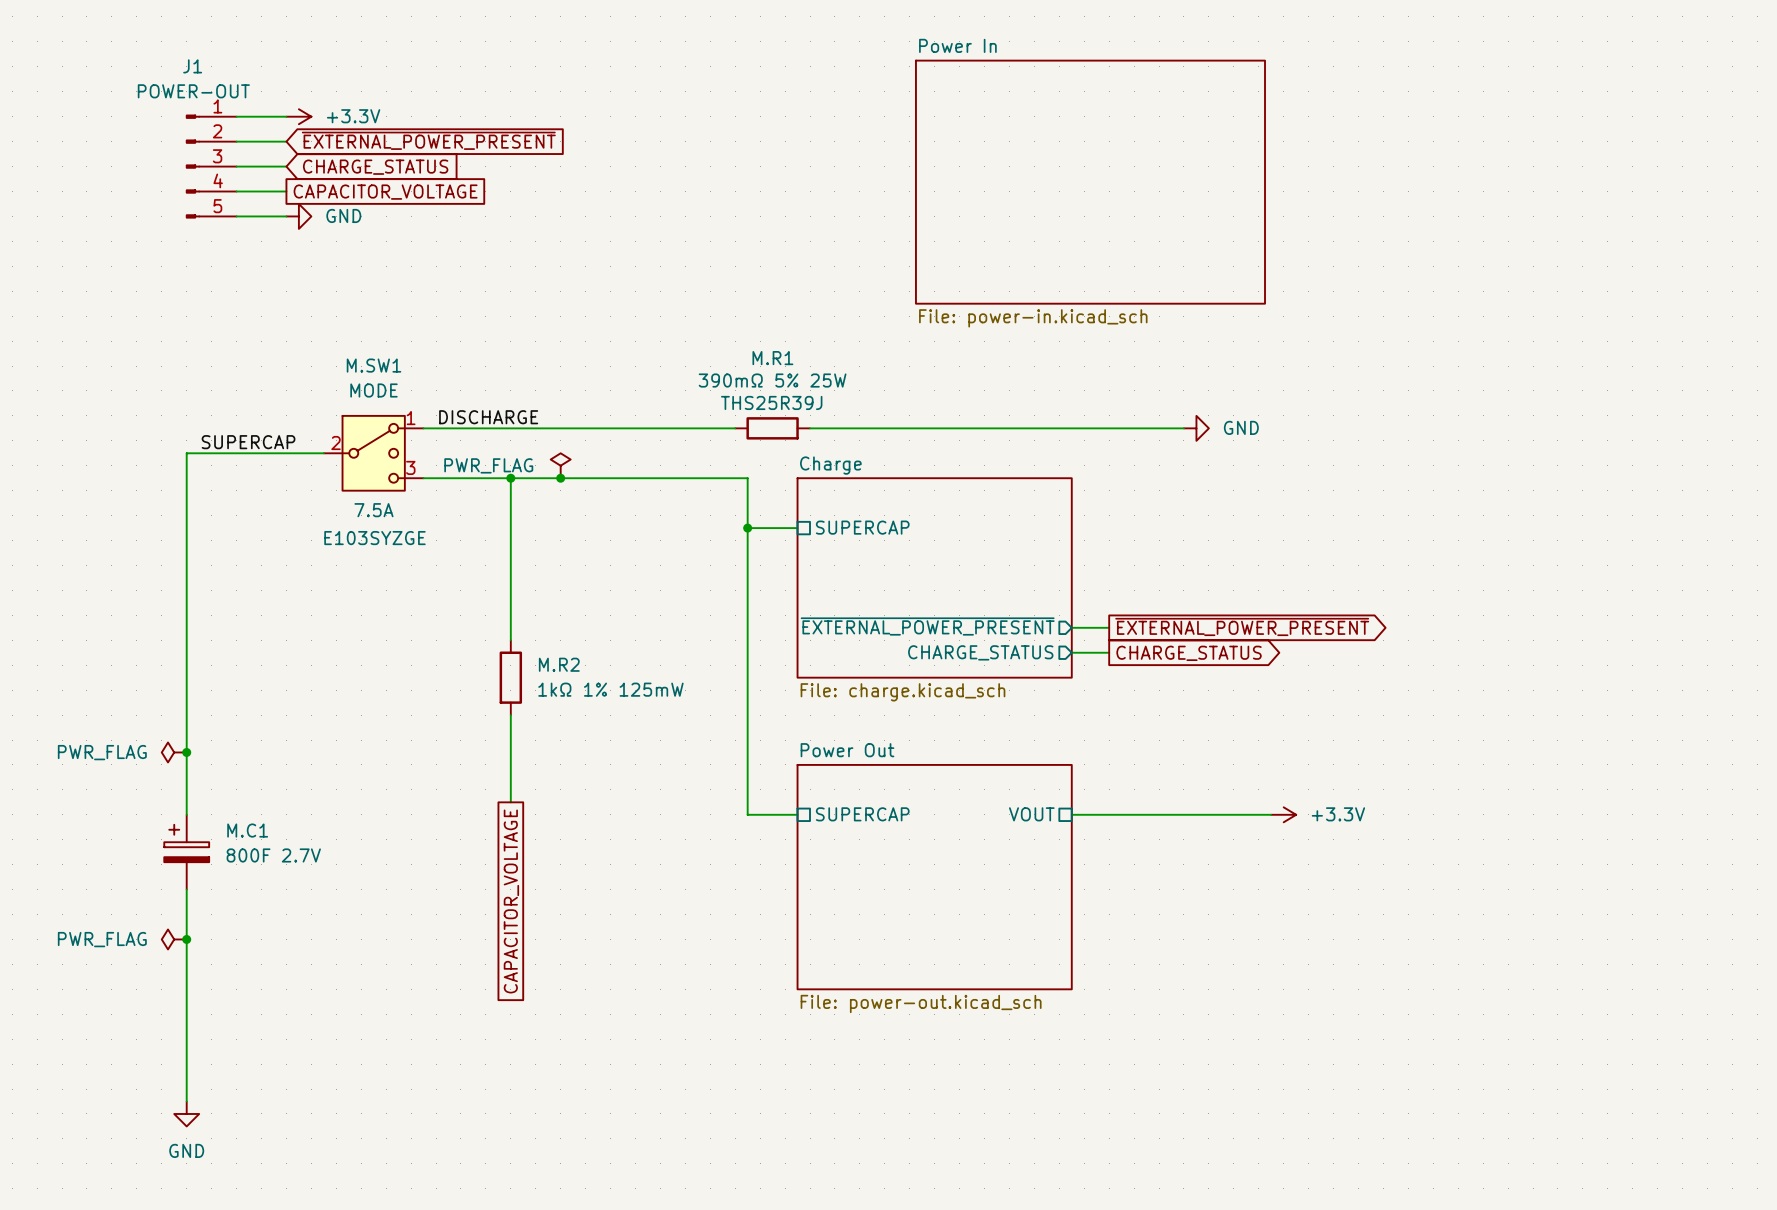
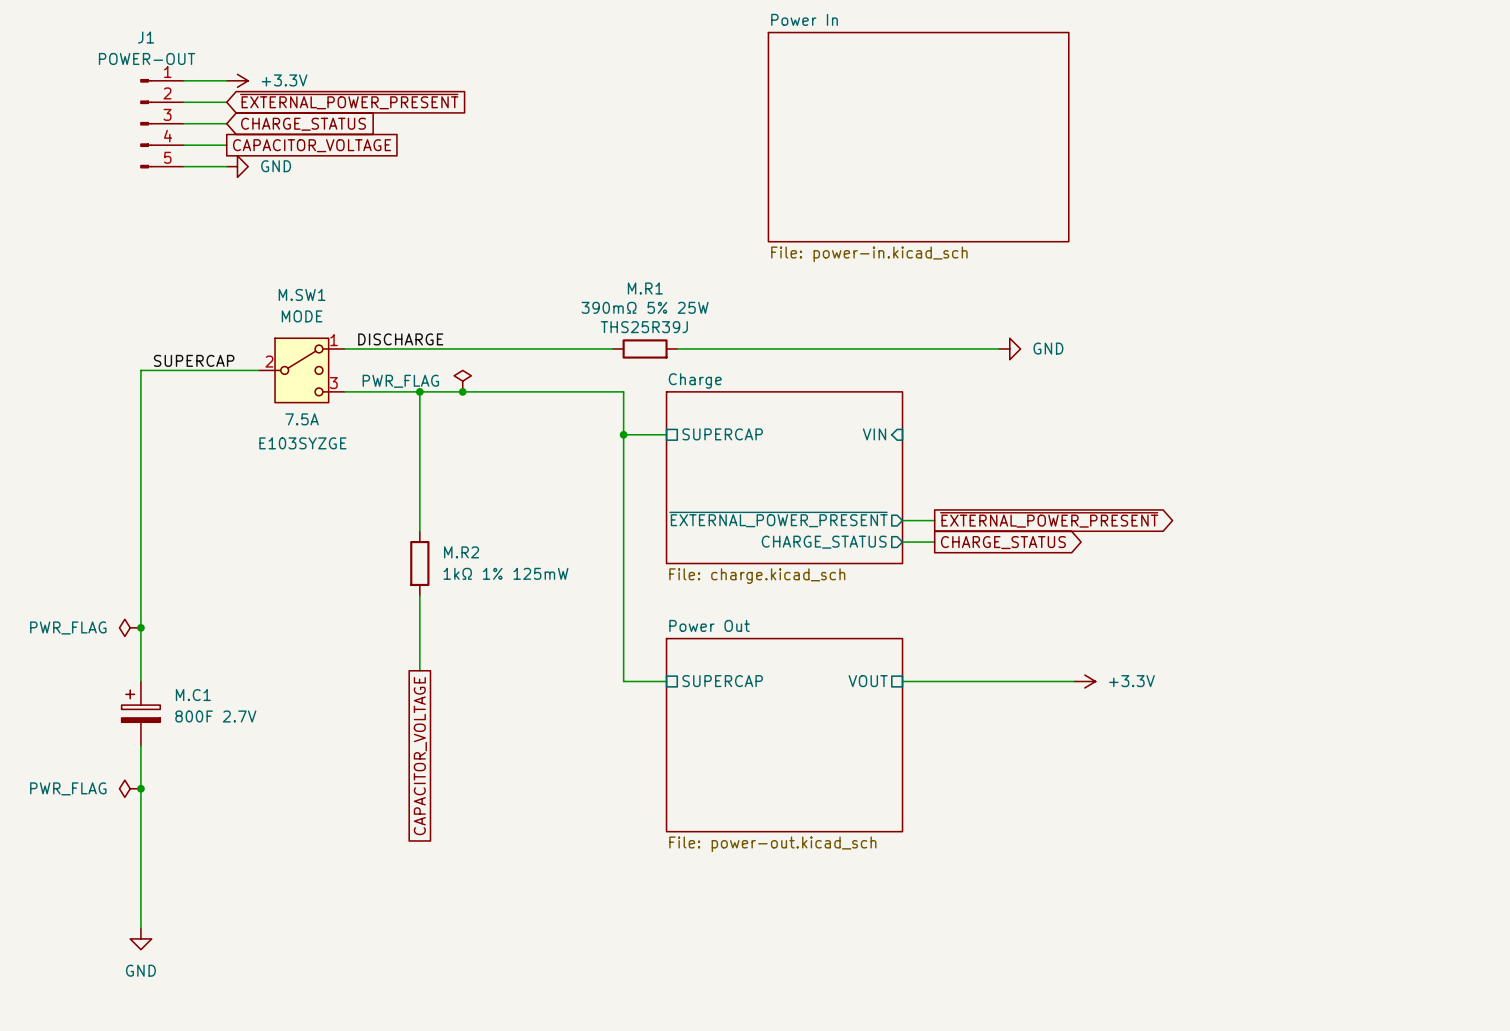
sheet pin: none -> VIN (874, 434)

